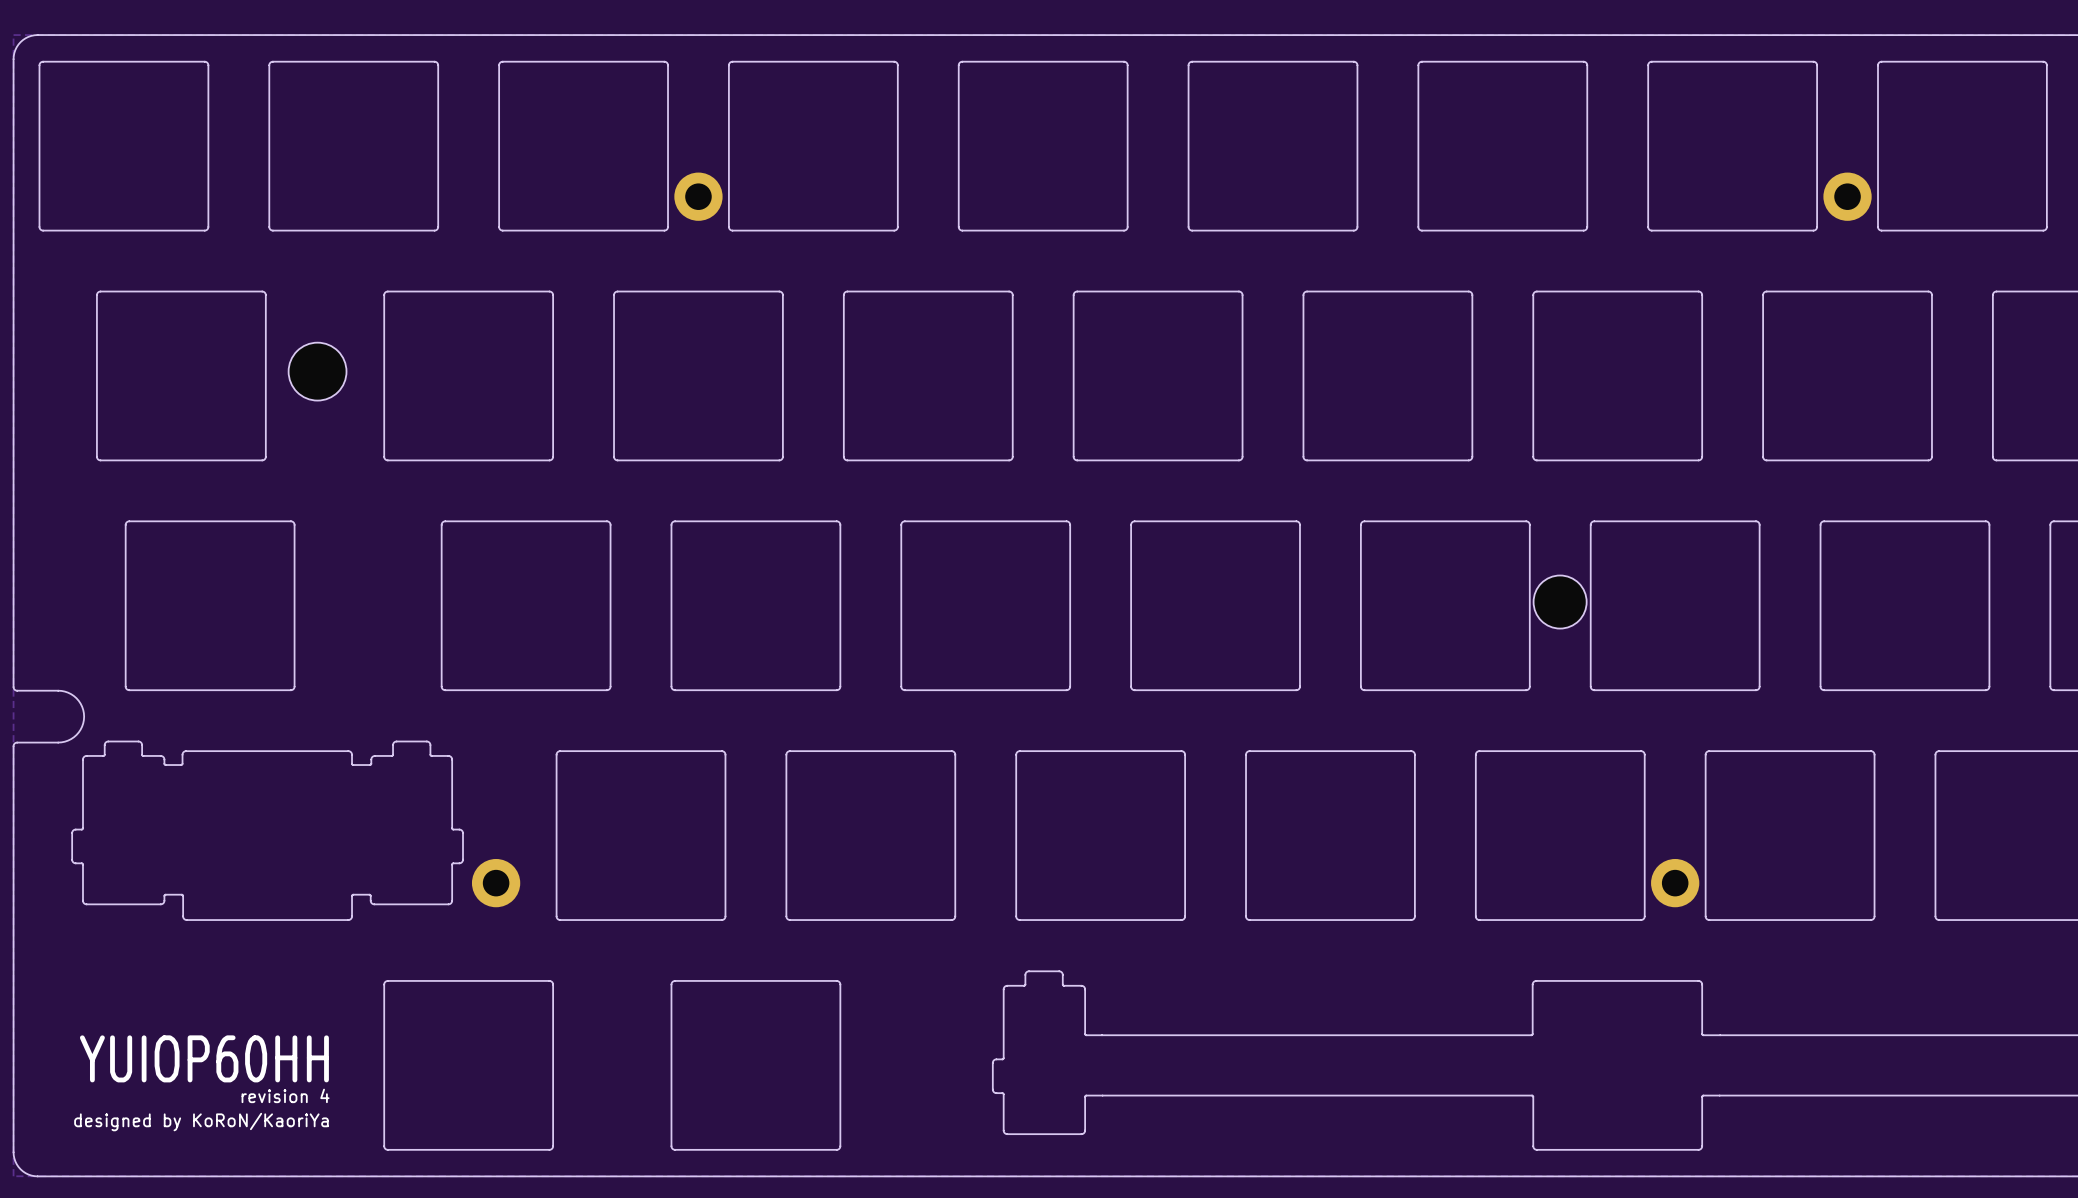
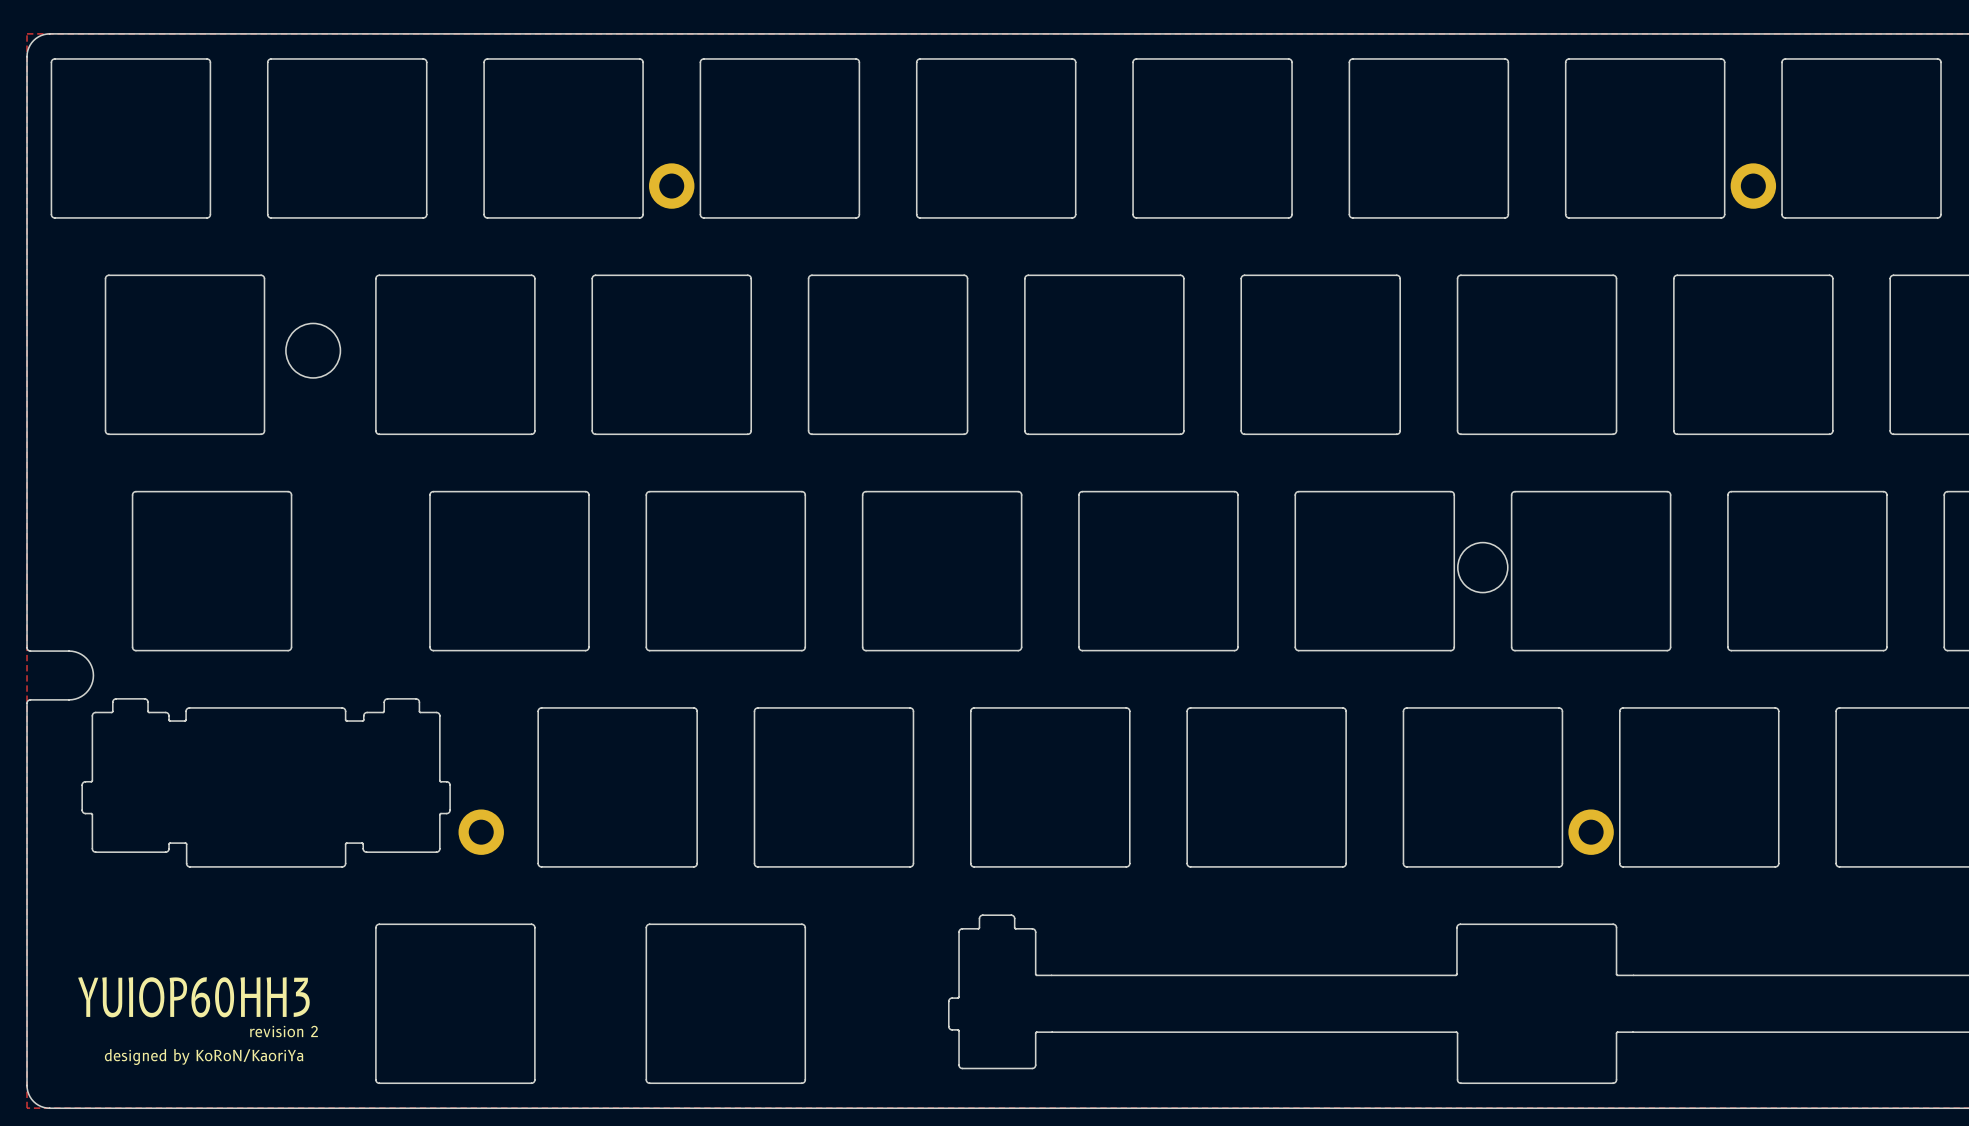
text: YUIOP60HH (204, 1058) -> YUIOP60HH3 (193, 997)
text: revision 4 (285, 1095) -> revision 2 (284, 1031)

